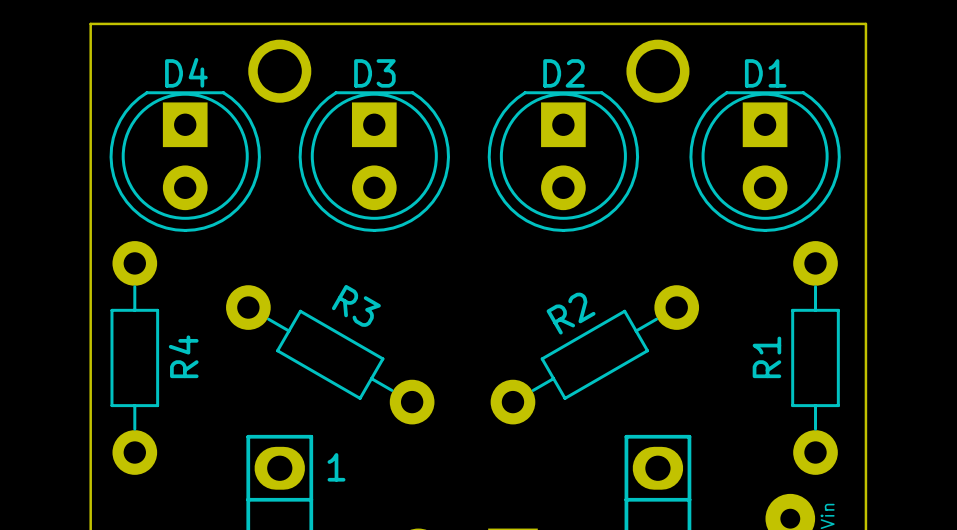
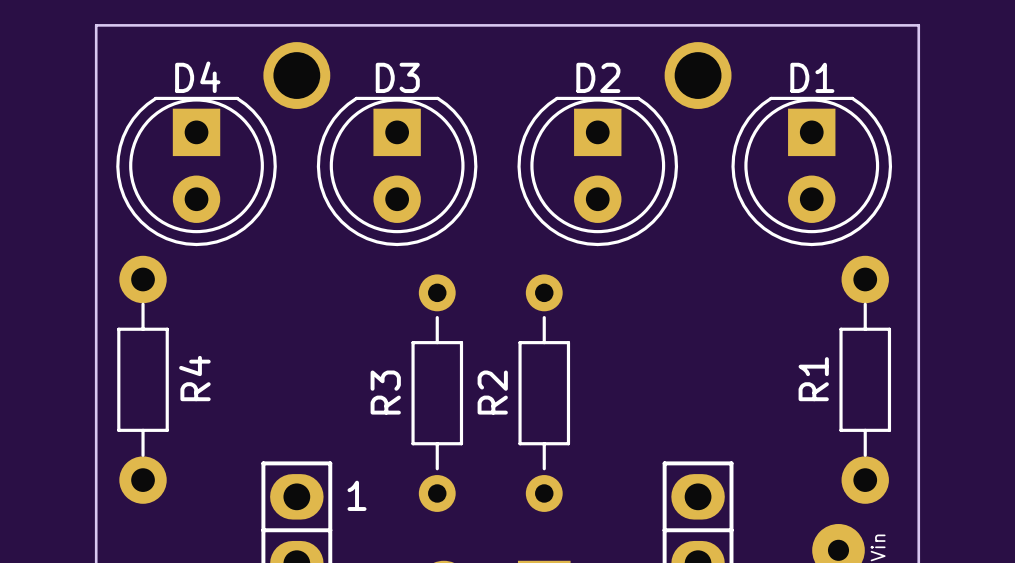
R3 footprint: [226, 285, 435, 425] -> [411, 274, 464, 512]
R2 footprint: [490, 285, 700, 425] -> [518, 274, 571, 512]
R3 name position: R3 (356, 305) -> R3 (385, 392)

